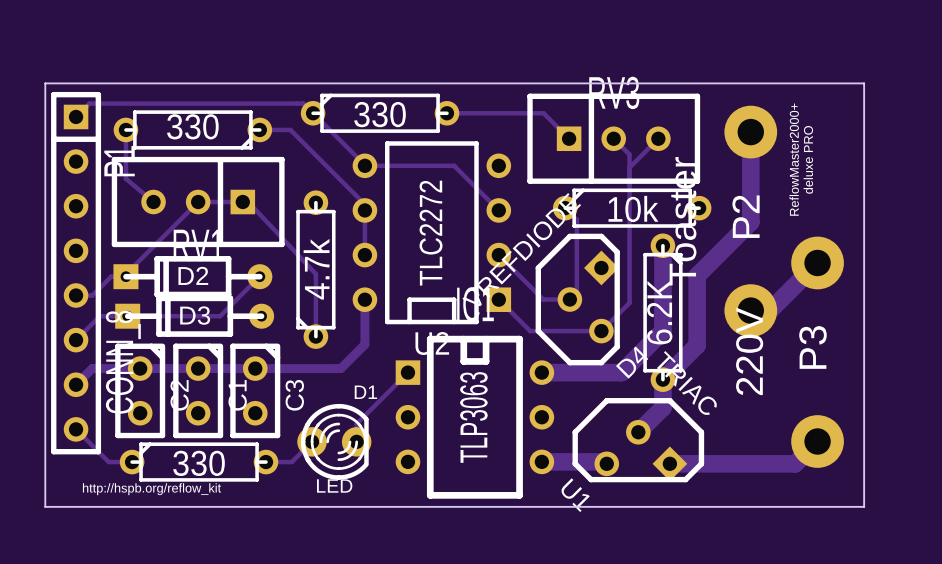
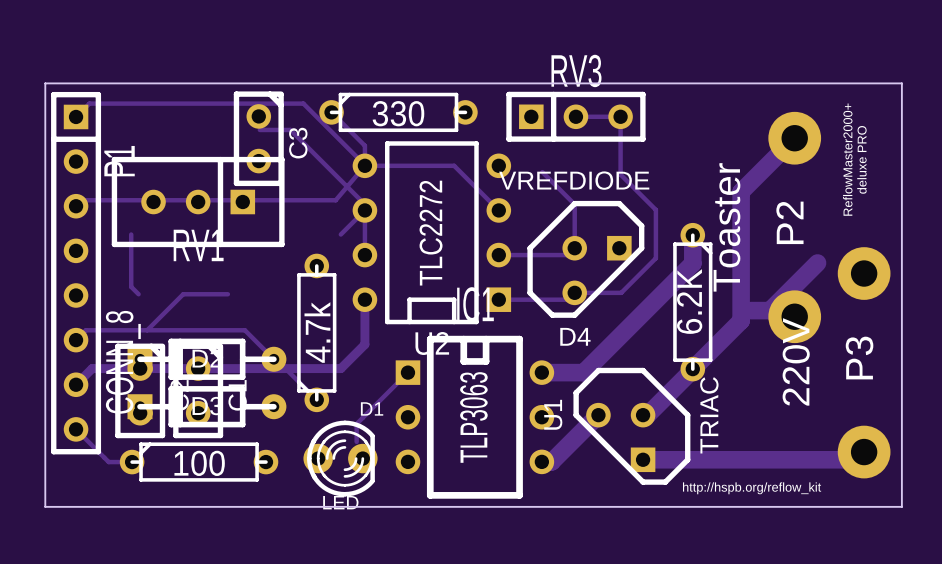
board edge: (864, 83) (864, 506) -> (864, 83) (901, 83) (901, 506) (864, 506)
RV3 footprint: [527, 93, 701, 184] -> [506, 91, 646, 142]
track: none -> (331, 112) (364, 145) (364, 165)
part position: (380, 113) -> (398, 112)
track: (446, 113) (543, 113) (569, 138) -> none
track: (125, 129) (125, 178) (153, 202) -> none
part: 330 (192, 129) -> none
track: (750, 132) (750, 222) (697, 275) (697, 345) (662, 379) (662, 407) (638, 432) -> none
track: (613, 138) (629, 154) (629, 302) (601, 331) (530, 331) (498, 299) -> (575, 116) (620, 116) (620, 174) (655, 209) (655, 258) (621, 292) (574, 292) (567, 299) (498, 299)
track: (658, 138) (629, 167) -> none
track: none -> (794, 138) (741, 191) (741, 320) (647, 415) (643, 415)
text position: ReflowMaster2000+ (794, 159) -> ReflowMaster2000+ (847, 159)
text position: deluxe PRO (808, 159) -> deluxe PRO (861, 159)
track: none -> (364, 165) (335, 200) (82, 200) (76, 206)
track: (565, 208) (576, 219) (576, 292) (569, 299) (543, 299) (498, 255) -> (542, 172) (574, 204) (574, 248) (567, 255) (498, 255)
part: 10k (632, 208) -> none
track: none -> (364, 210) (340, 234)
P2 position: (750, 221) -> (794, 227)
track: none -> (131, 234) (131, 286) (138, 294)
track: (662, 245) (662, 331) (621, 372) (583, 372) -> (692, 235) (692, 263) (583, 372)
part position: (315, 269) -> (316, 332)
D2 position: (192, 276) -> (206, 359)
track: (259, 276) (220, 316) (99, 316) (85, 330) -> (316, 399) (244, 330) (85, 330)
track: none -> (227, 294) (183, 294) (147, 330)
track: (76, 295) (92, 295) (111, 276) (125, 276) (125, 274) (198, 202) (248, 202) (315, 274) (315, 336) -> none
D4 rotation: 0° (577, 299) -> 45° clockwise (585, 259)
part position: (662, 312) -> (692, 302)
D3 position: (194, 316) -> (206, 406)
P3 position: (817, 352) -> (864, 362)
C3 position: (255, 390) -> (258, 138)
track: (311, 440) (291, 462) (265, 462) -> none
U1 rotation: 0° (638, 440) -> 45° clockwise (631, 426)
D1 position: (334, 441) -> (340, 458)
track: (817, 441) (795, 463) (669, 463) -> none
track: none -> (864, 452) (856, 459) (643, 459)
track: (551, 461) (604, 461) (606, 463) -> (551, 461) (598, 415)
part value: 330 (199, 463) -> 100 (199, 463)
text: none -> http://hspb.org/reflow_kit (752, 488)
text: http://hspb.org/reflow_kit (152, 489) -> none

